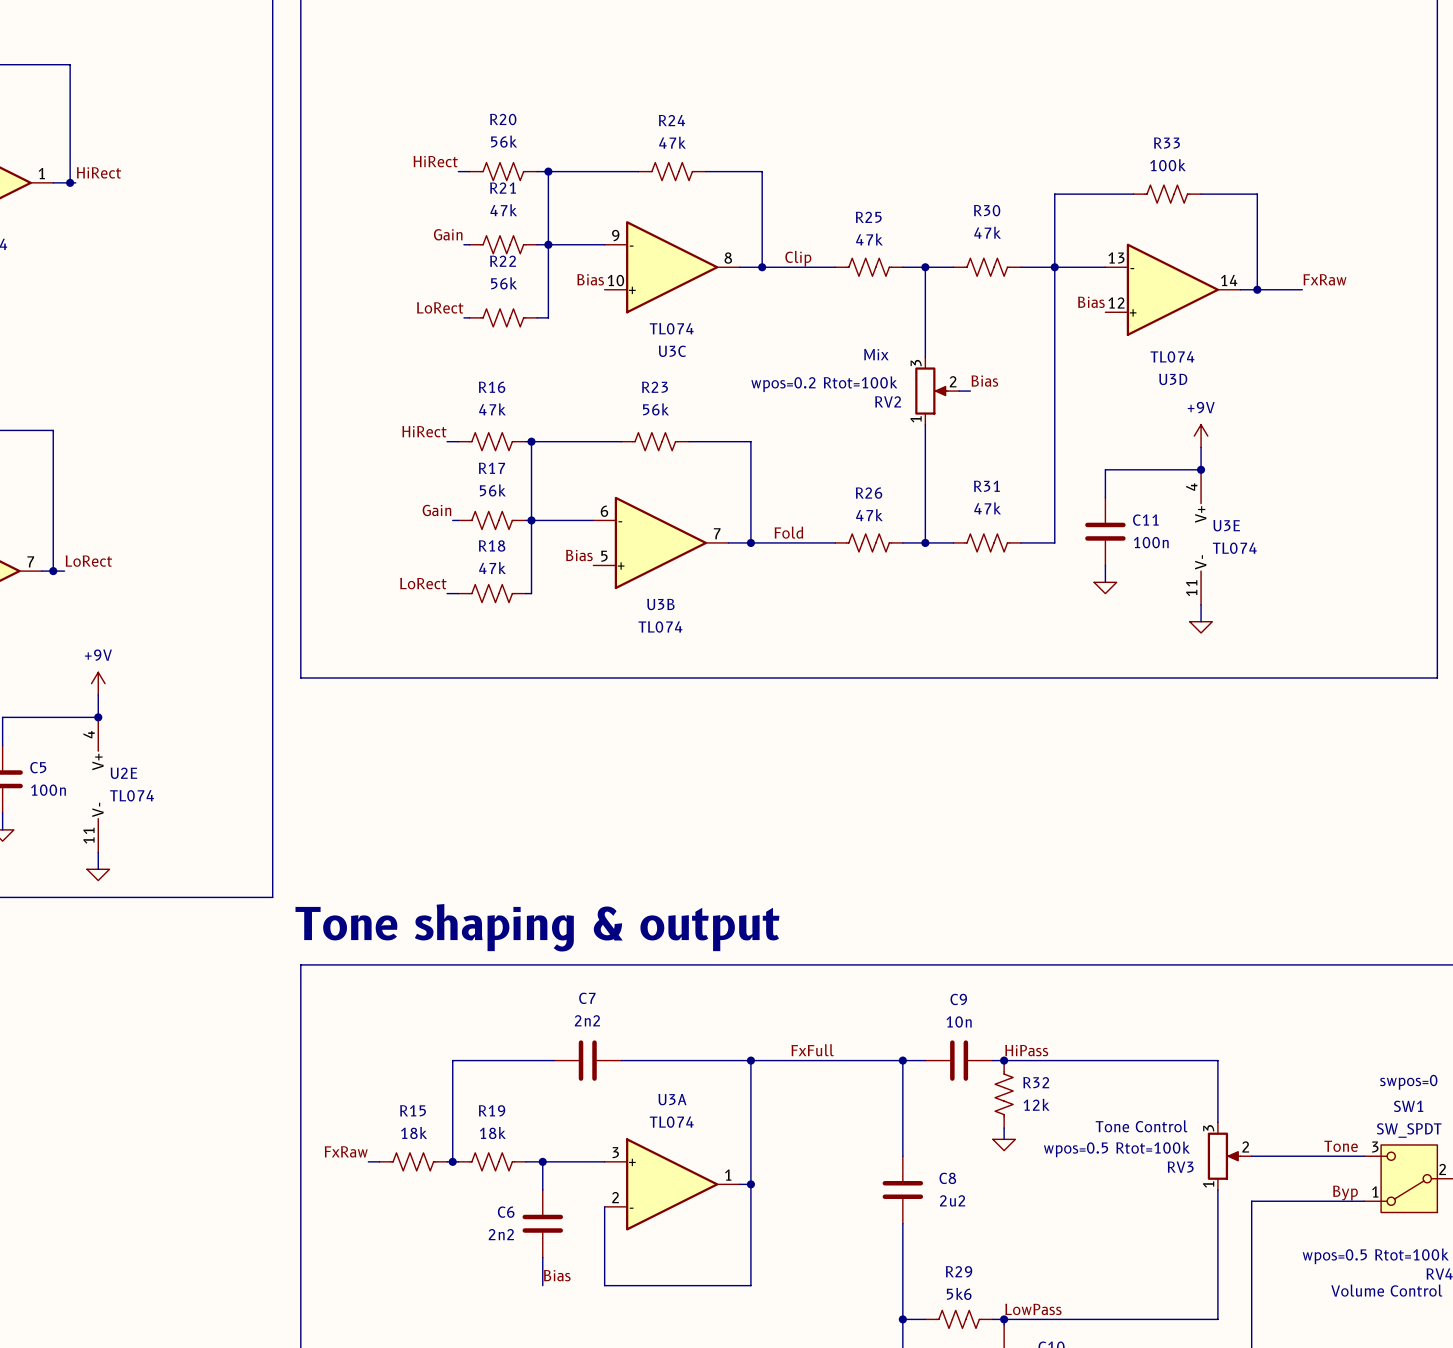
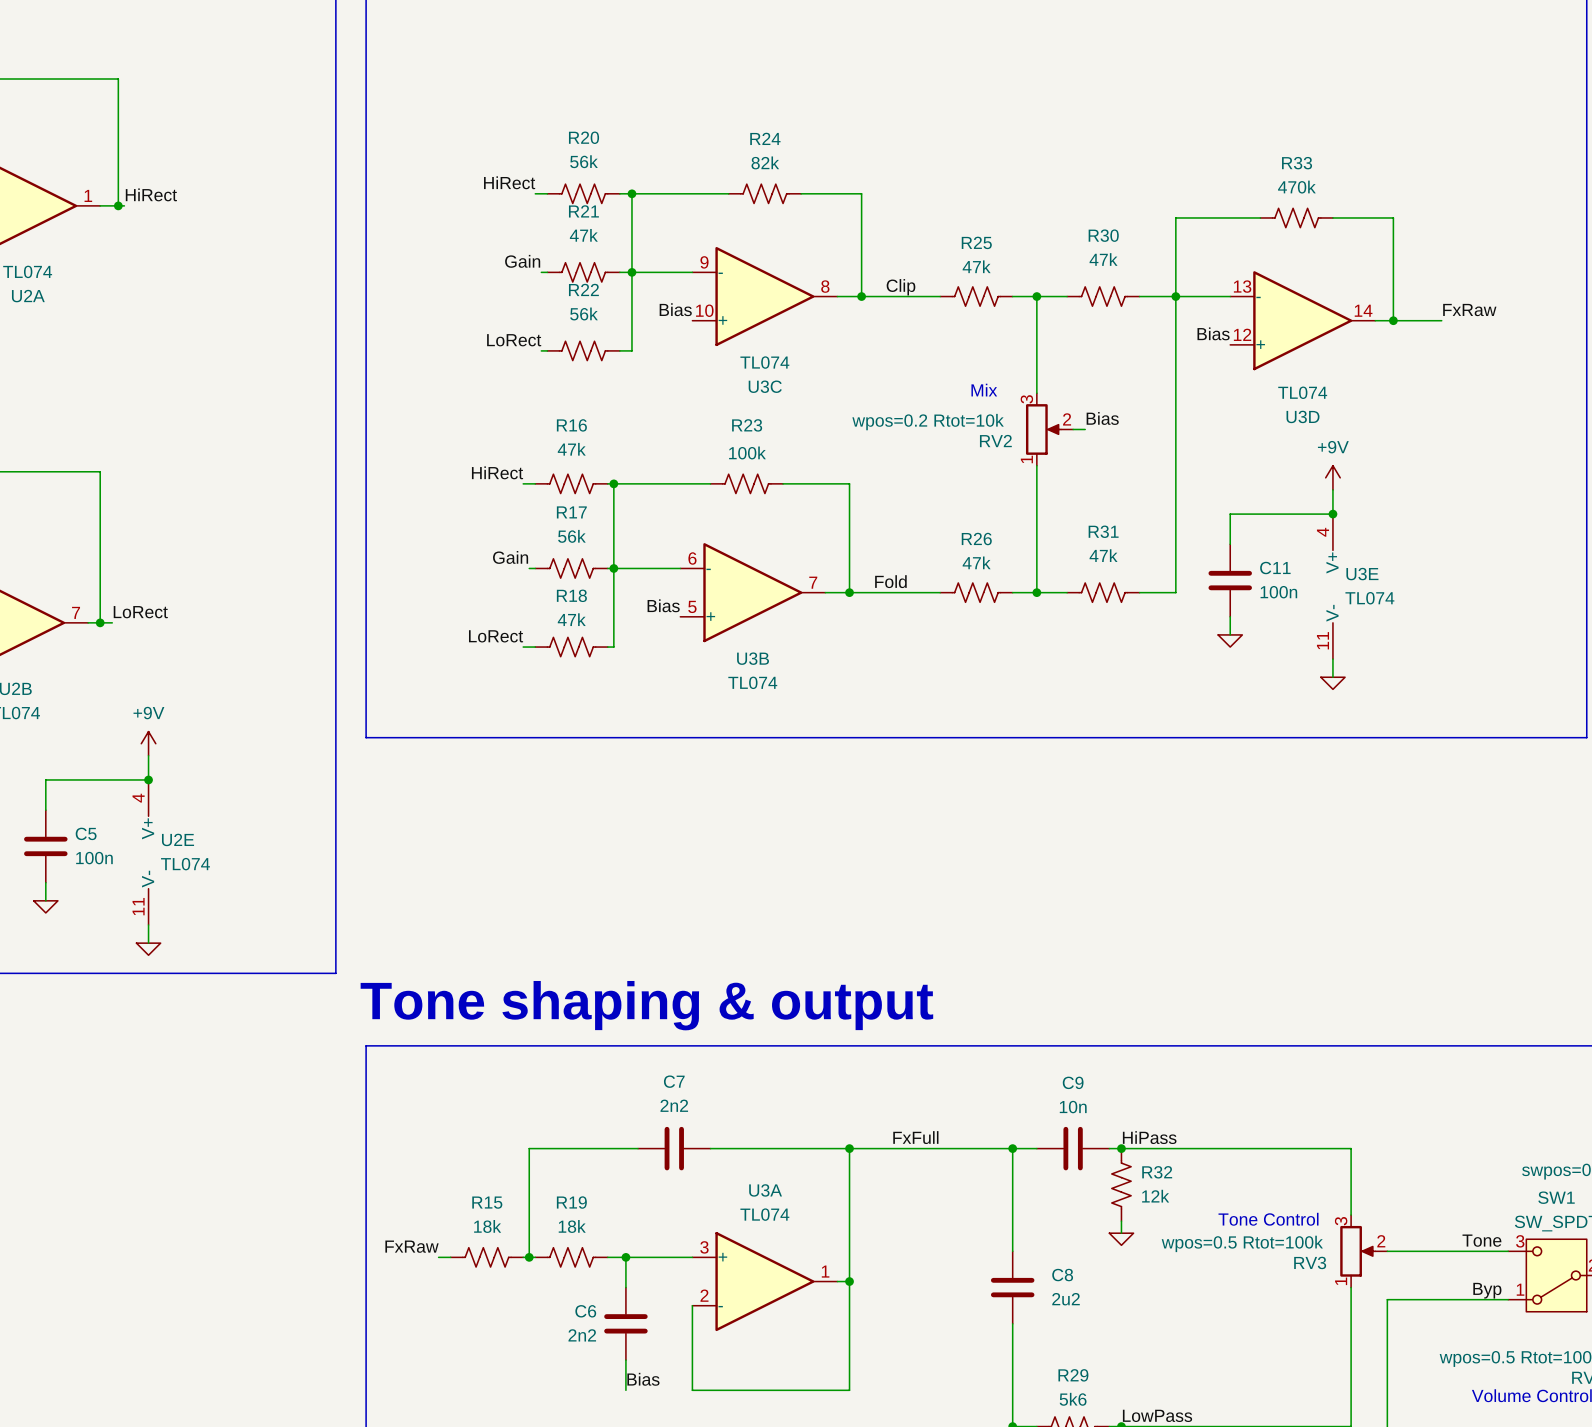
R24 value: 47k (672, 142) -> 82k (765, 162)
R33 value: 100k (1168, 165) -> 470k (1296, 187)
RV2 text: wpos=0.2 Rtot=100k (824, 384) -> wpos=0.2 Rtot=10k (928, 422)
R23 value: 56k (656, 409) -> 100k (747, 452)

